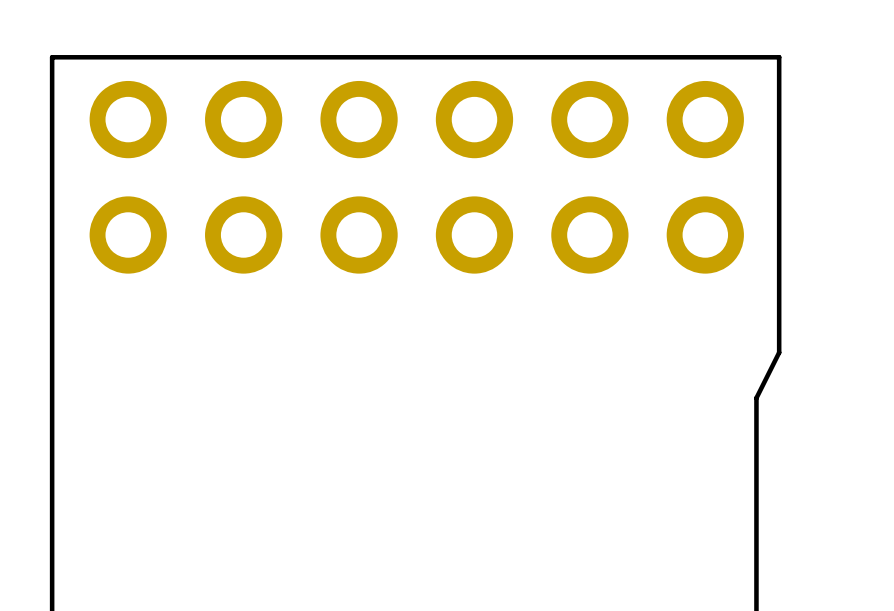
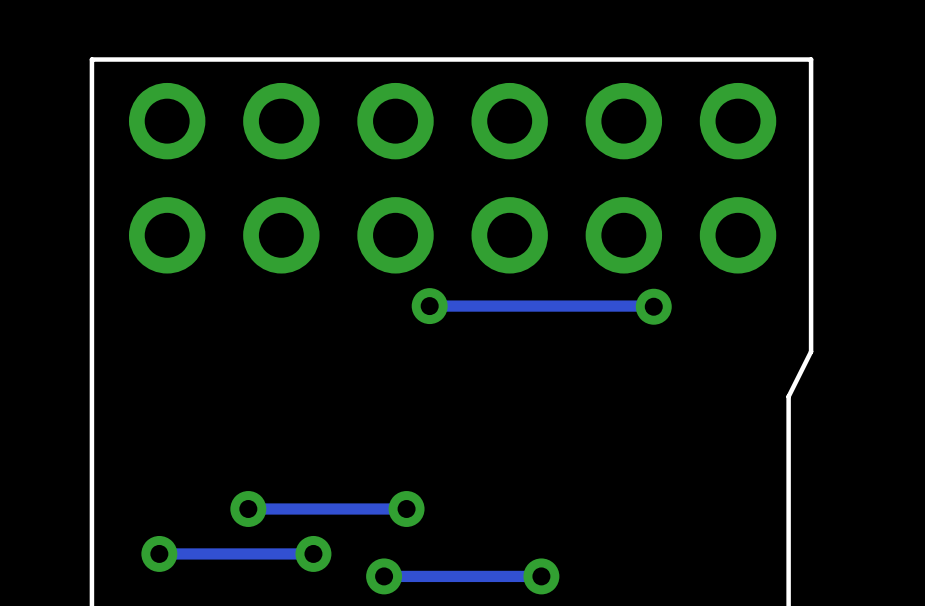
track: none -> (429, 306) (653, 306)
via: none -> (429, 306)
via: none -> (653, 306)
via: none -> (248, 509)
track: none -> (406, 509) (248, 509)
via: none -> (406, 509)
via: none -> (159, 553)
track: none -> (313, 553) (159, 553)
via: none -> (313, 553)
via: none -> (384, 576)
track: none -> (541, 576) (384, 576)
via: none -> (541, 576)

